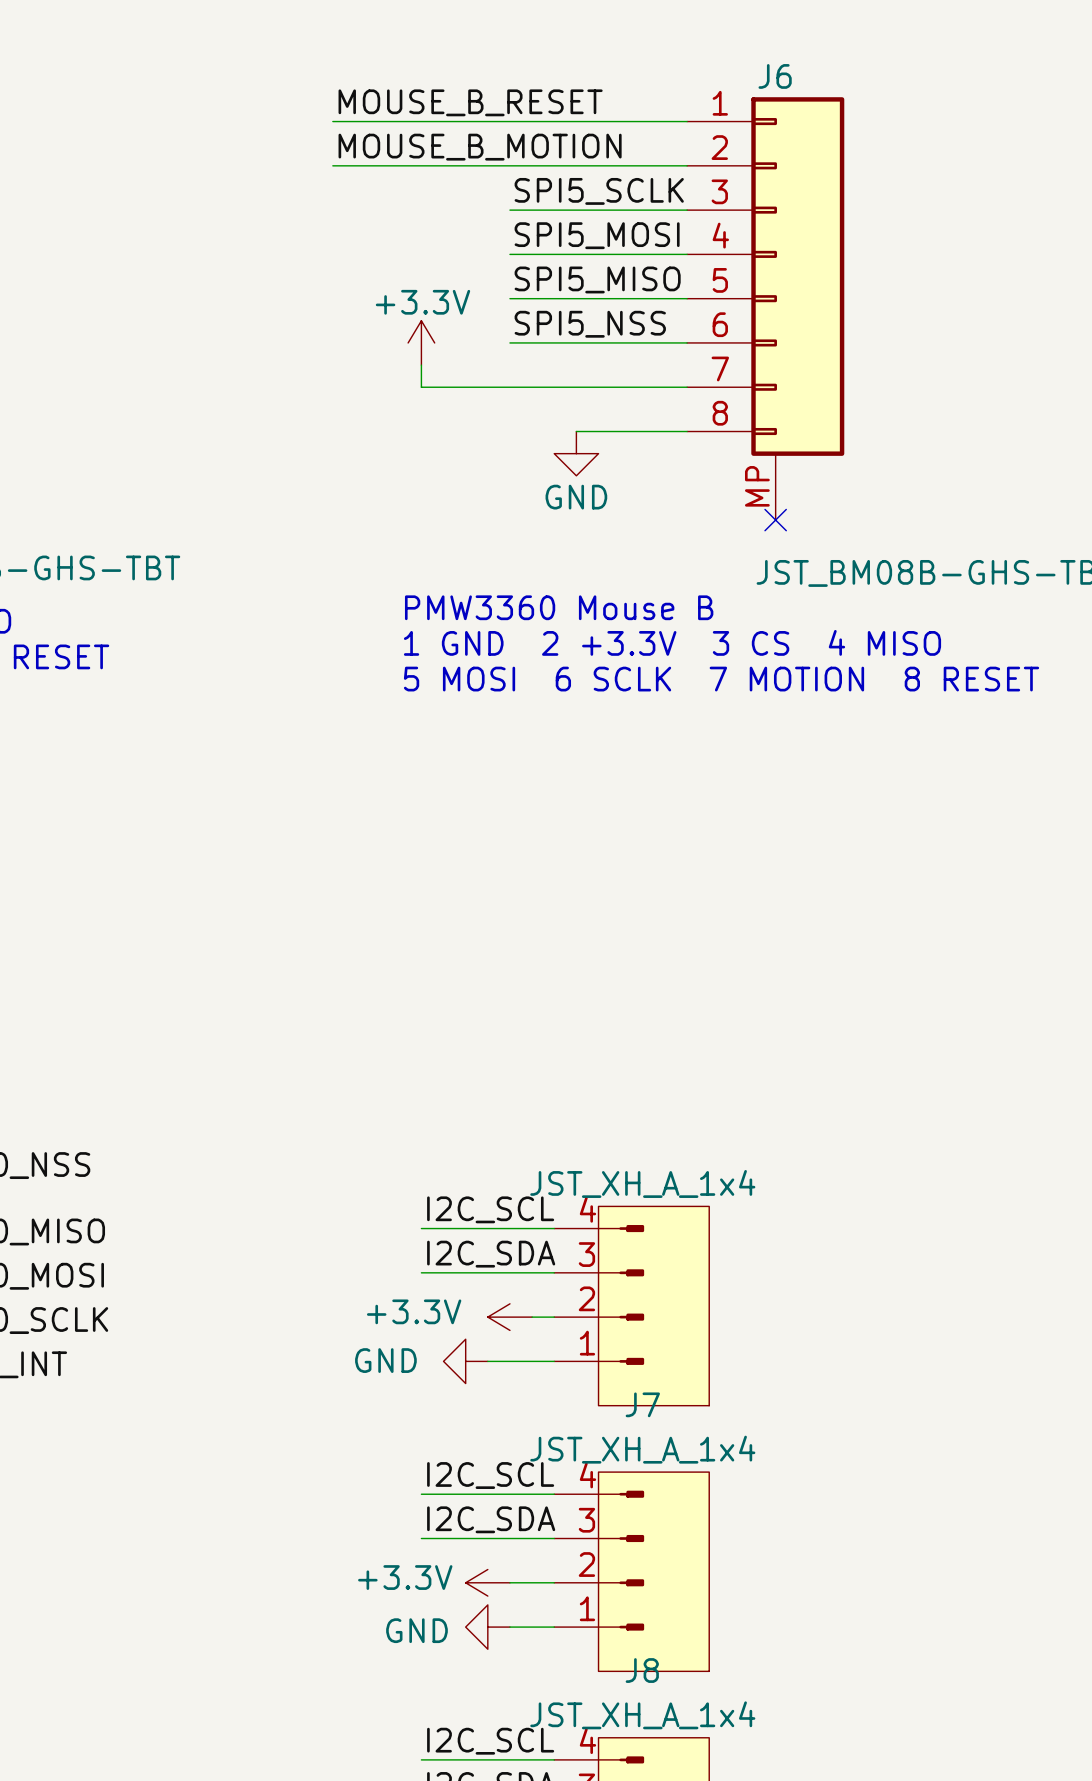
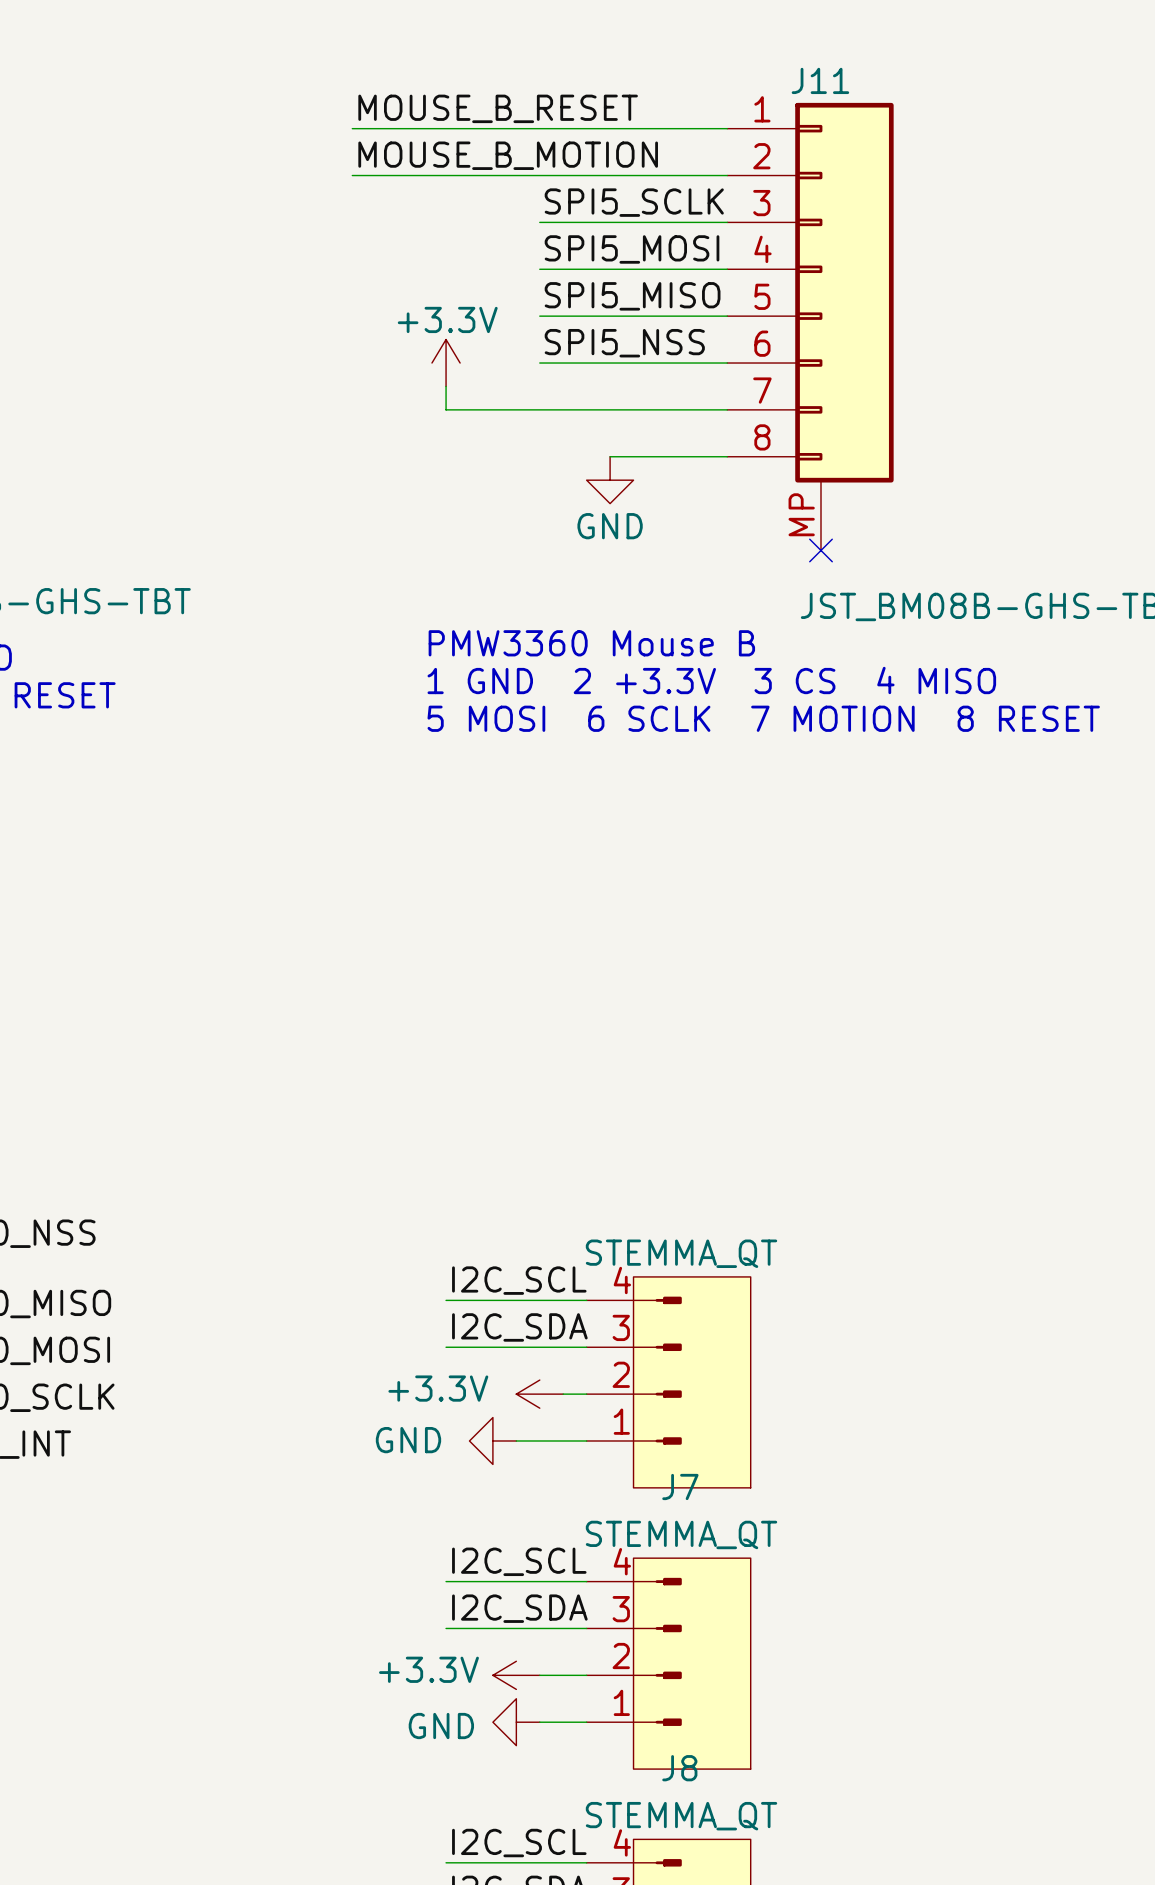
J6 name: J6 (775, 76) -> J11 (820, 80)
J7 value: JST_XH_A_1x4 (642, 1183) -> STEMMA_QT (681, 1253)
J8 value: JST_XH_A_1x4 (642, 1449) -> STEMMA_QT (681, 1534)
part value: JST_XH_A_1x4 (642, 1715) -> STEMMA_QT (681, 1816)

